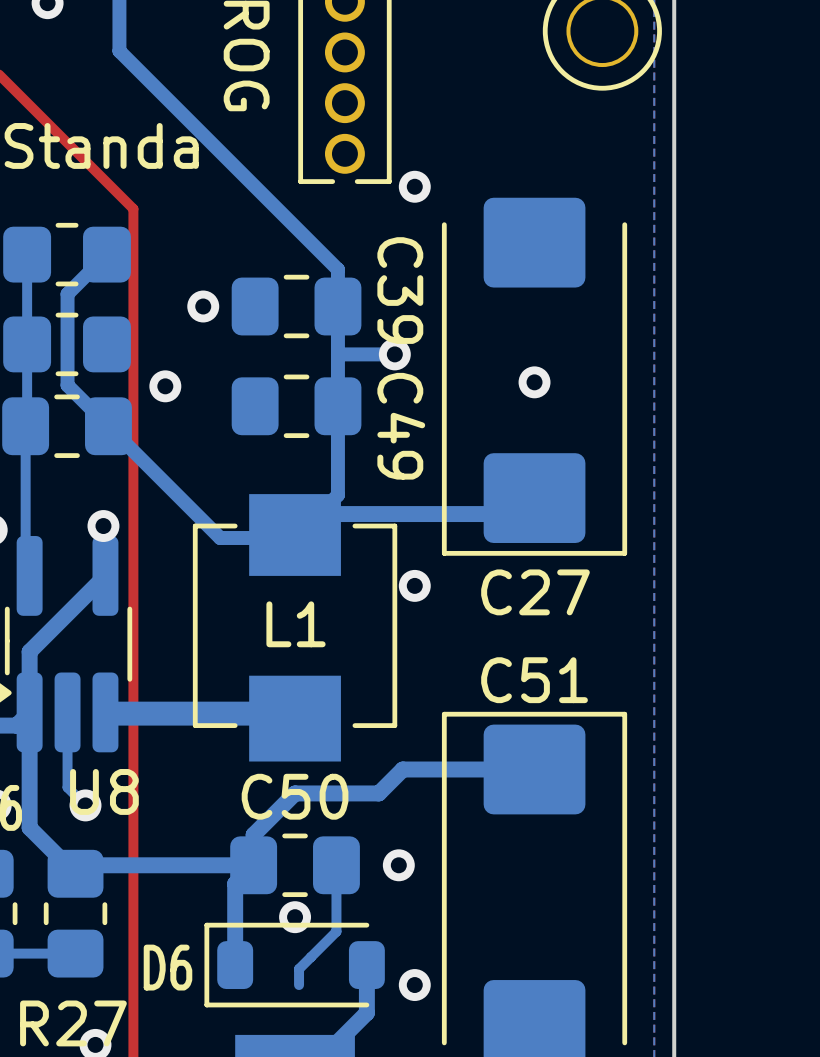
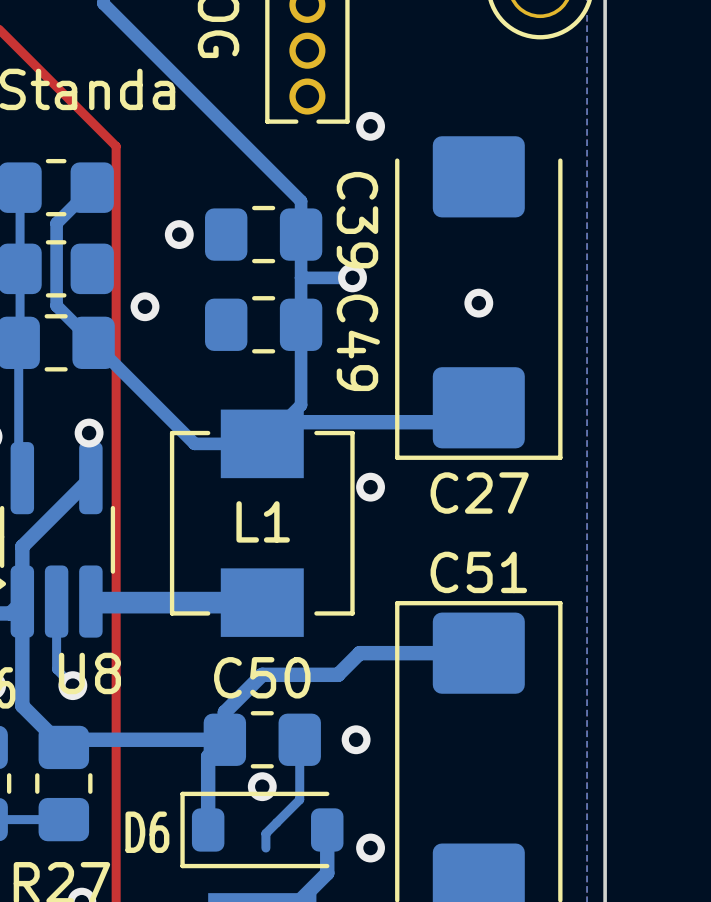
L1 footprint: [192, 494, 398, 762] -> [169, 409, 355, 637]

